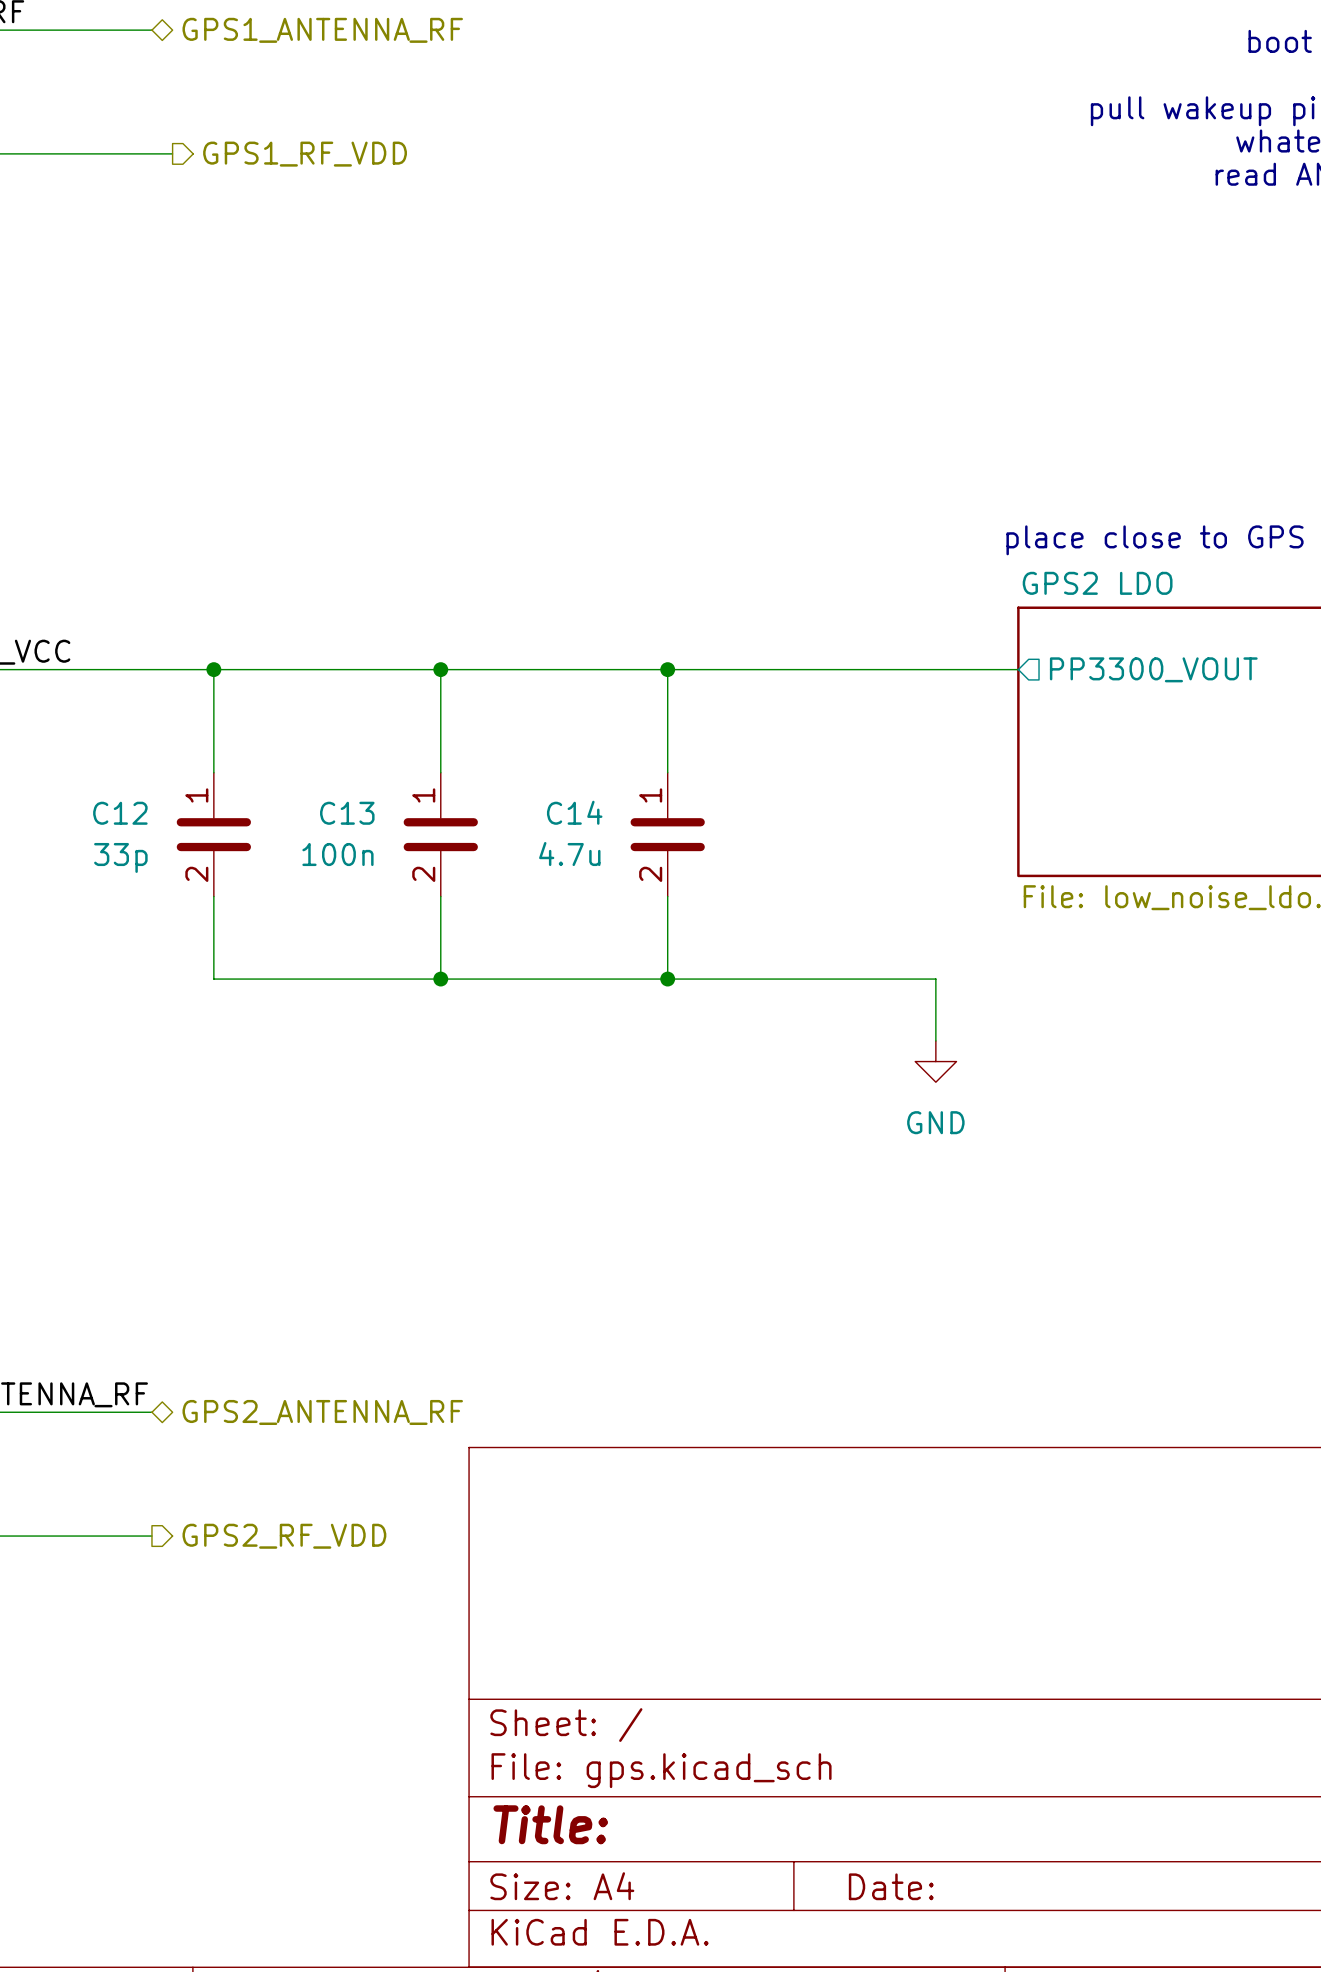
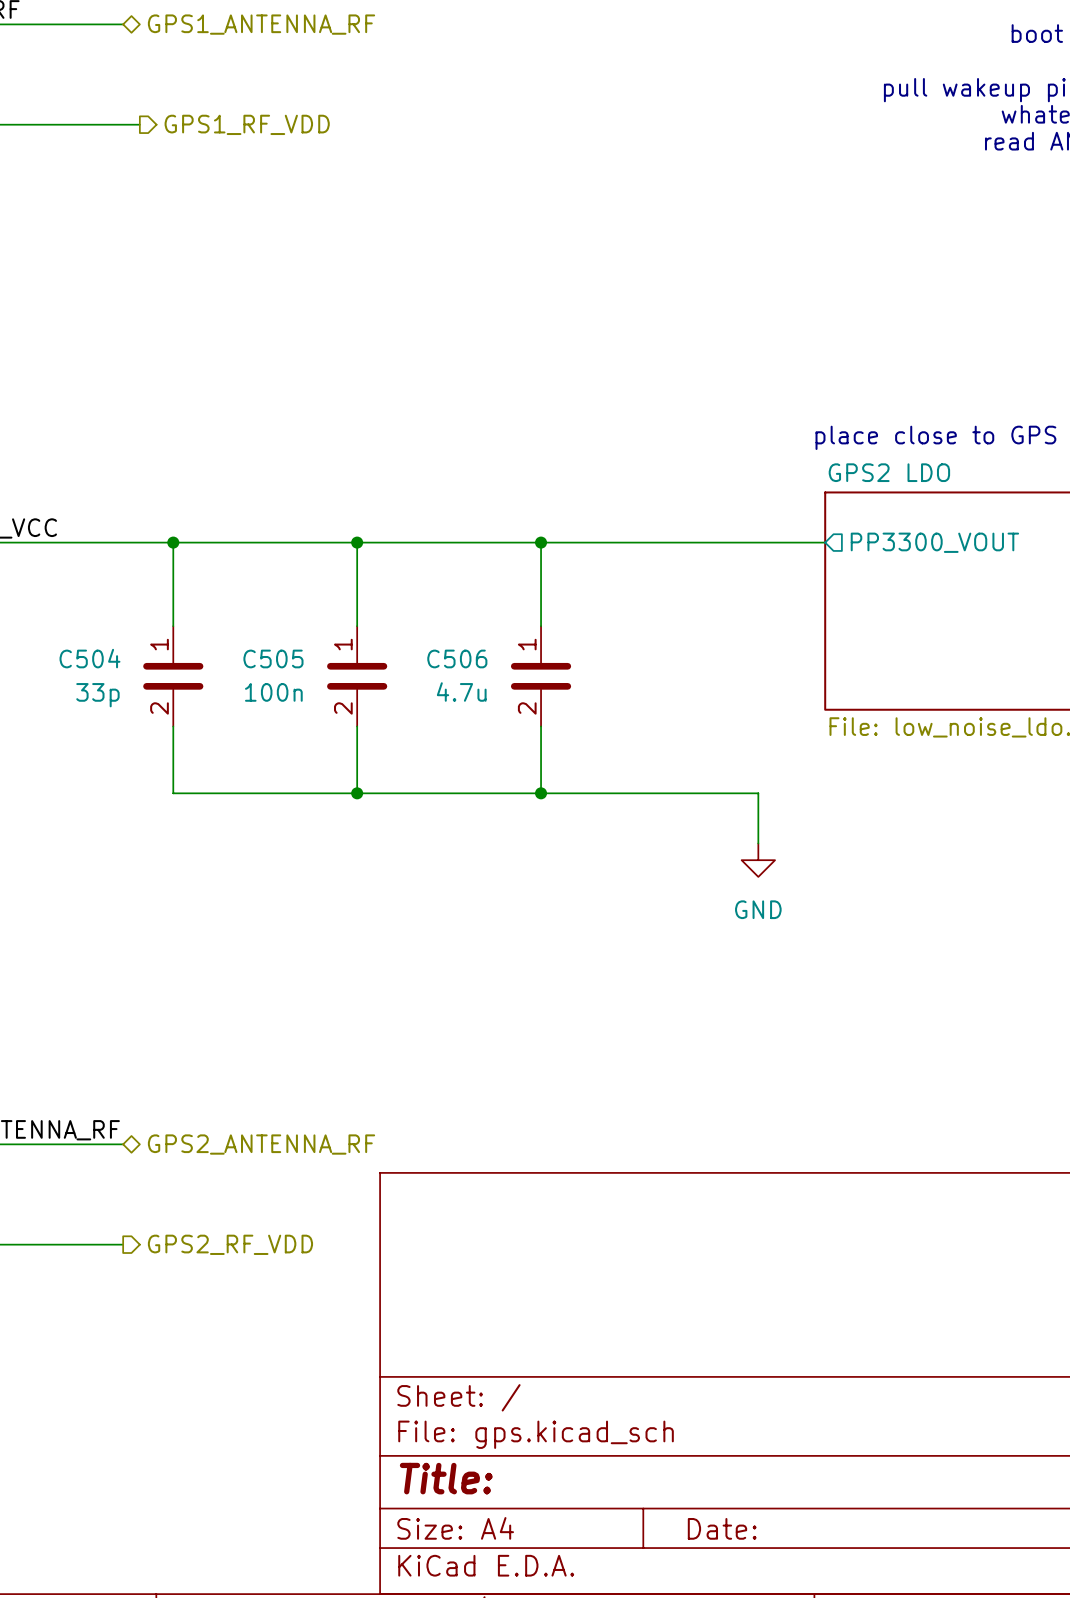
C14 name: C14 (574, 812) -> C506 (457, 658)
C12 name: C12 (120, 813) -> C504 (89, 658)
C13 name: C13 (347, 813) -> C505 (273, 658)

